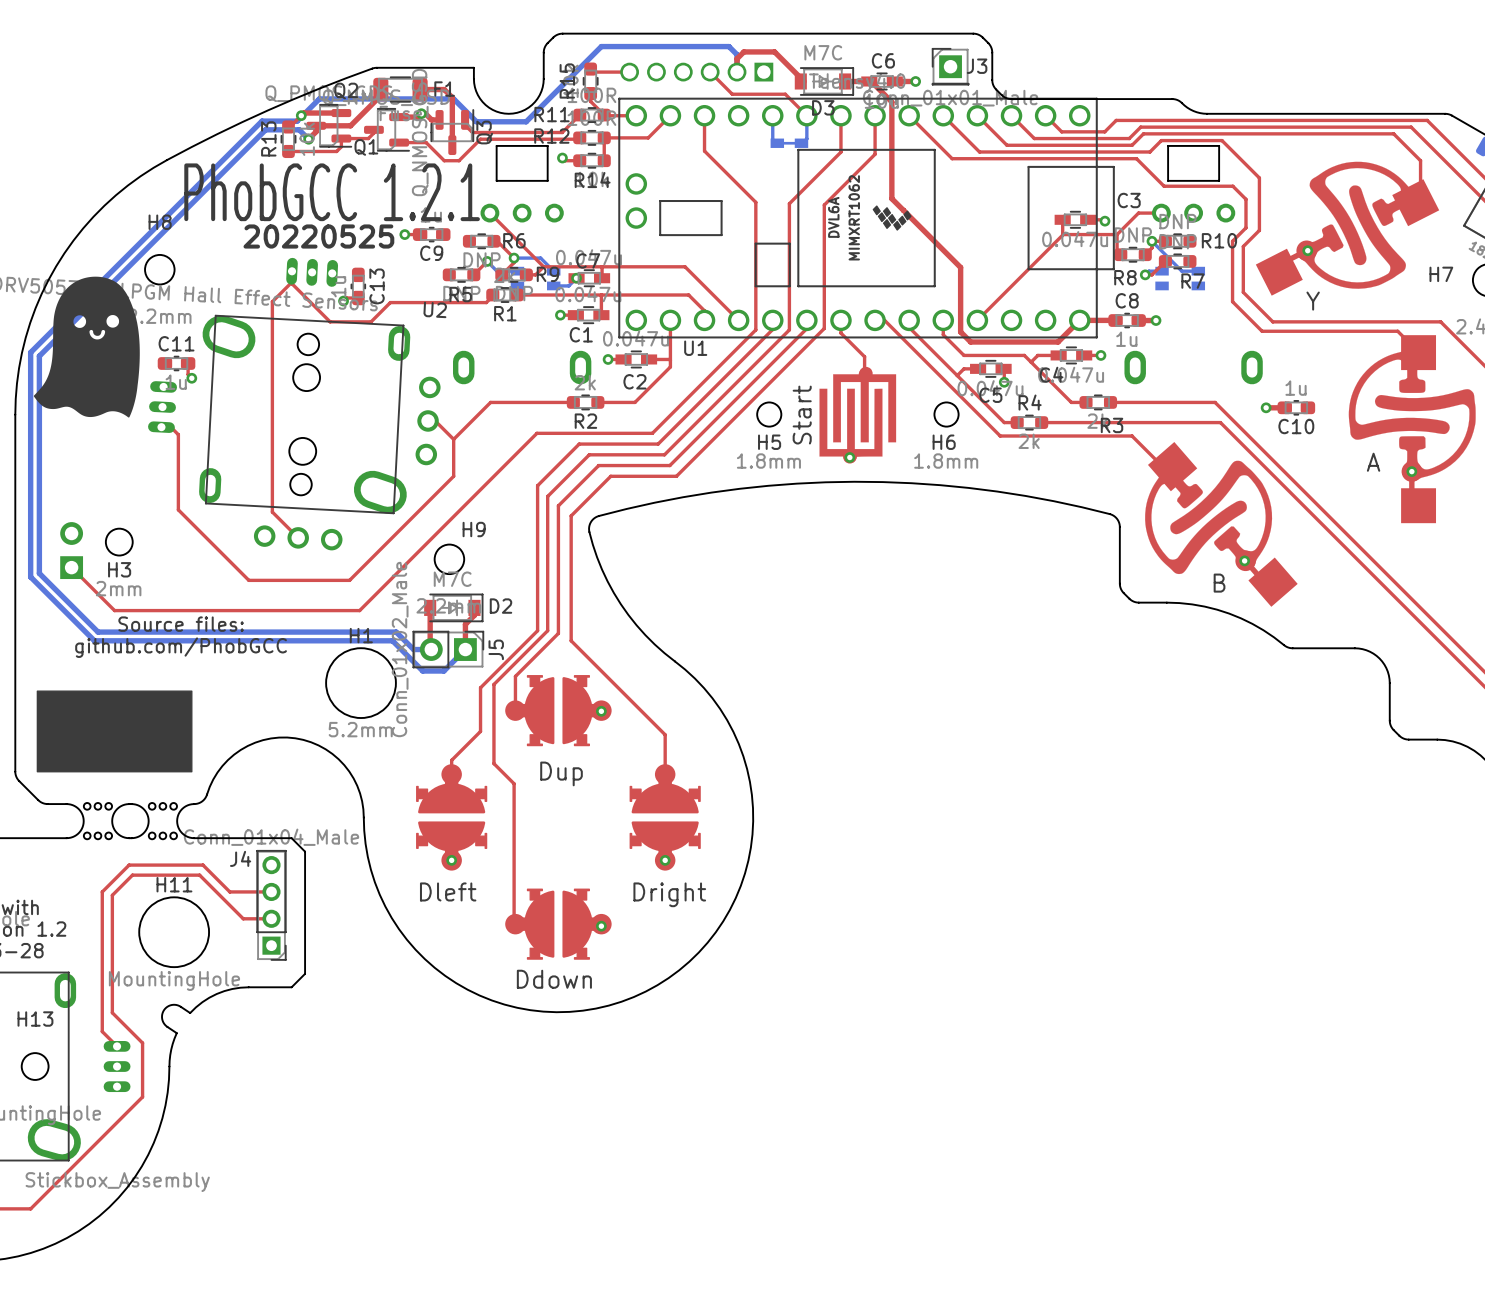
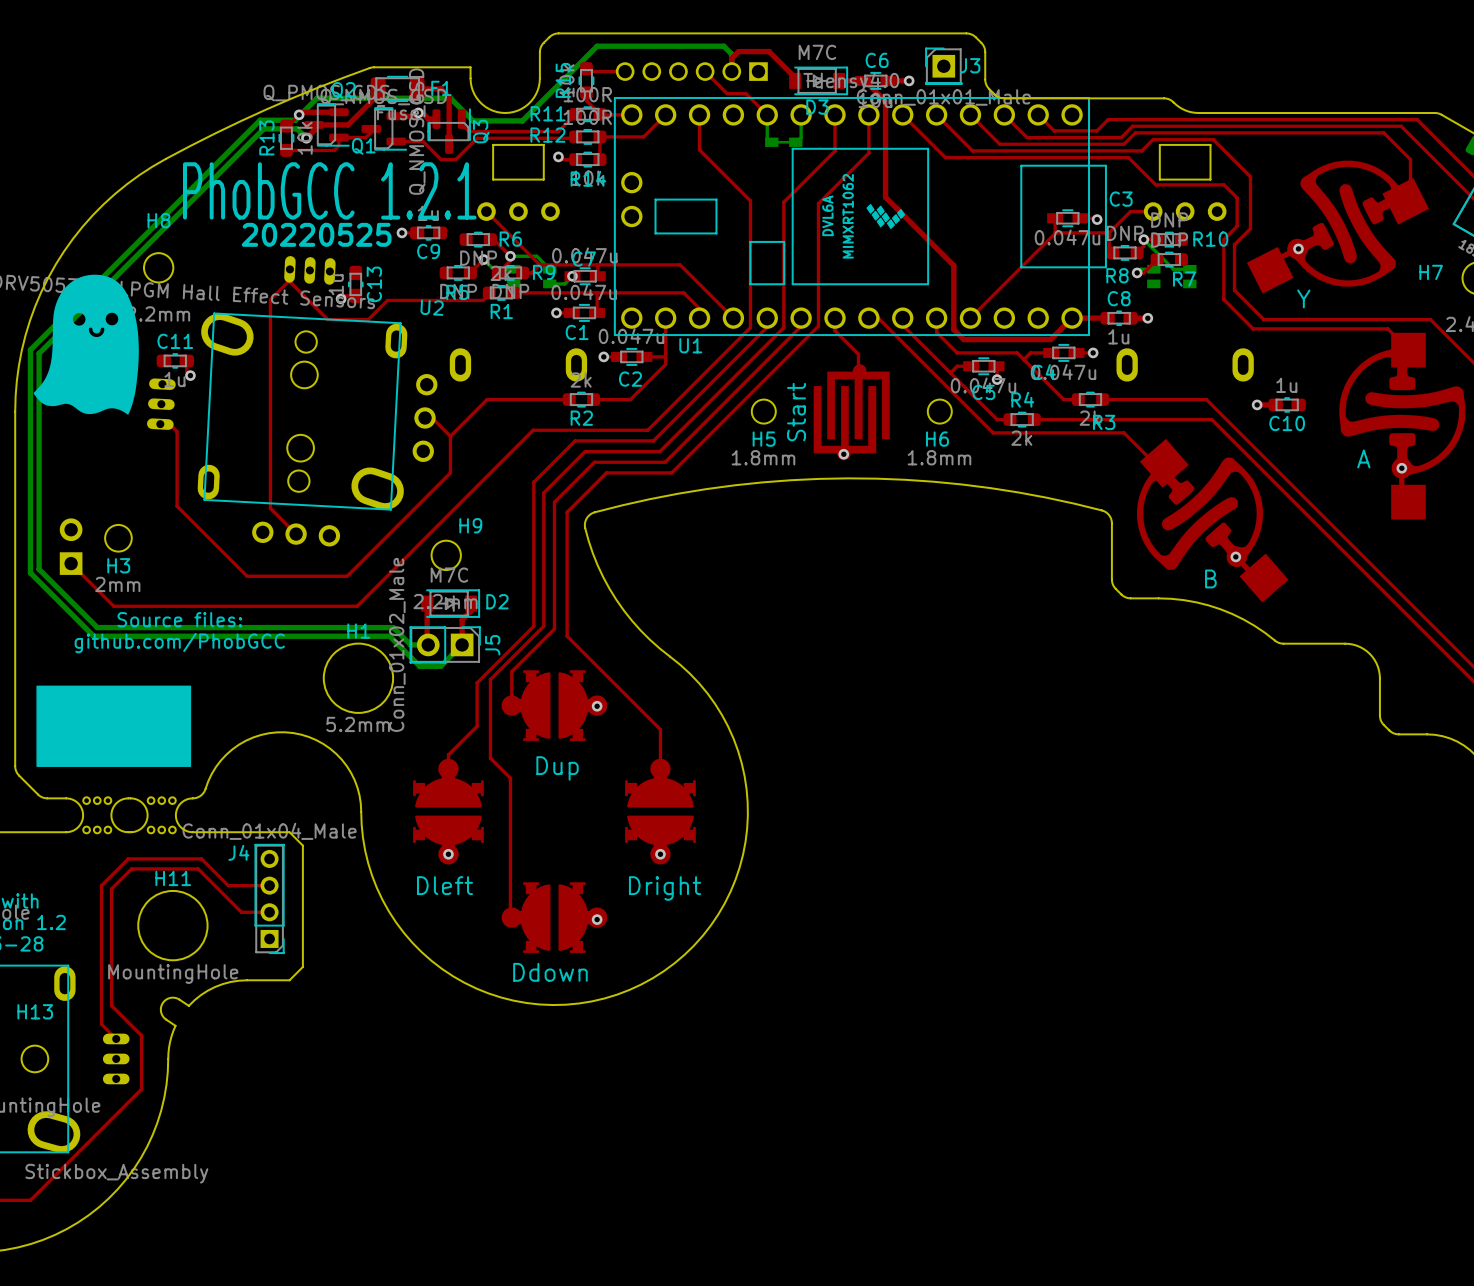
top track: (751, 94) (785, 94) (806, 115) -> (745, 93) (767, 114)

